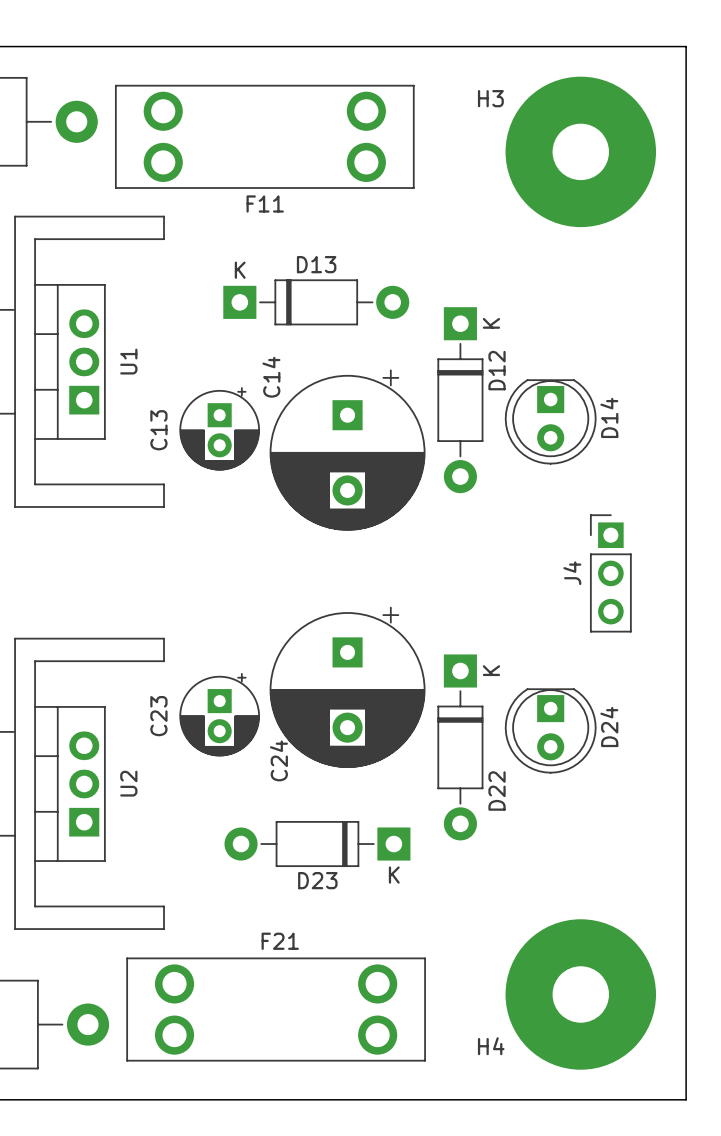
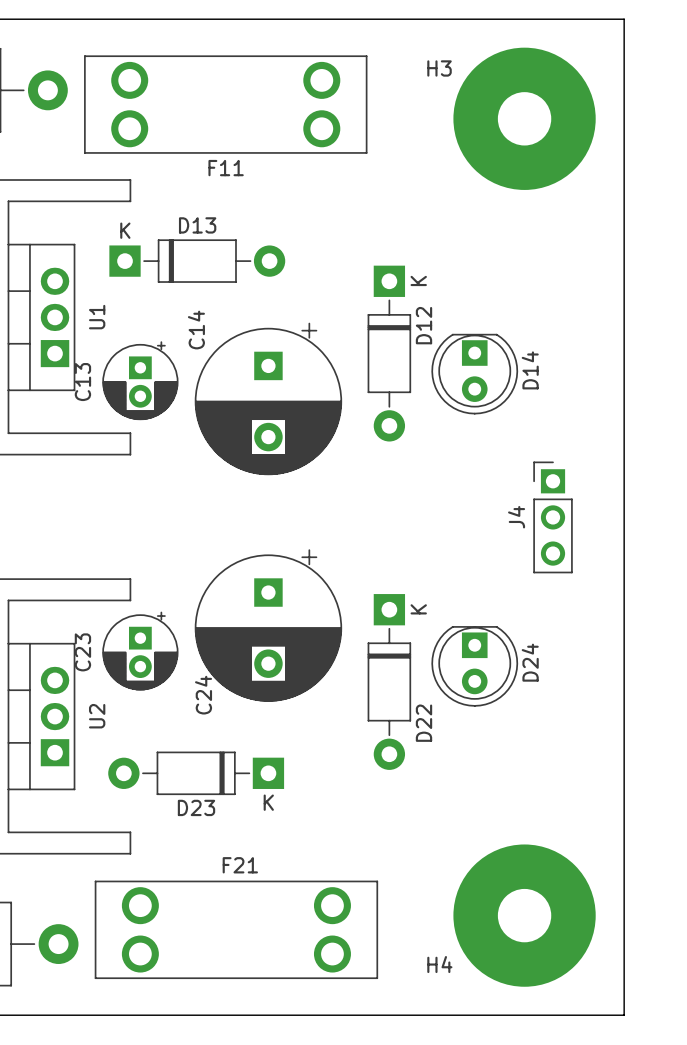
D13 position: (316, 302) -> (197, 261)
D12 position: (460, 400) -> (389, 353)
D14 position: (550, 421) -> (474, 374)
C13 position: (219, 428) -> (140, 380)
C14 position: (347, 450) -> (268, 398)
C24 position: (347, 687) -> (268, 625)
C23 position: (219, 714) -> (140, 651)
D24 position: (550, 730) -> (474, 666)
D22 position: (460, 747) -> (389, 681)
D23 position: (317, 844) -> (196, 773)

